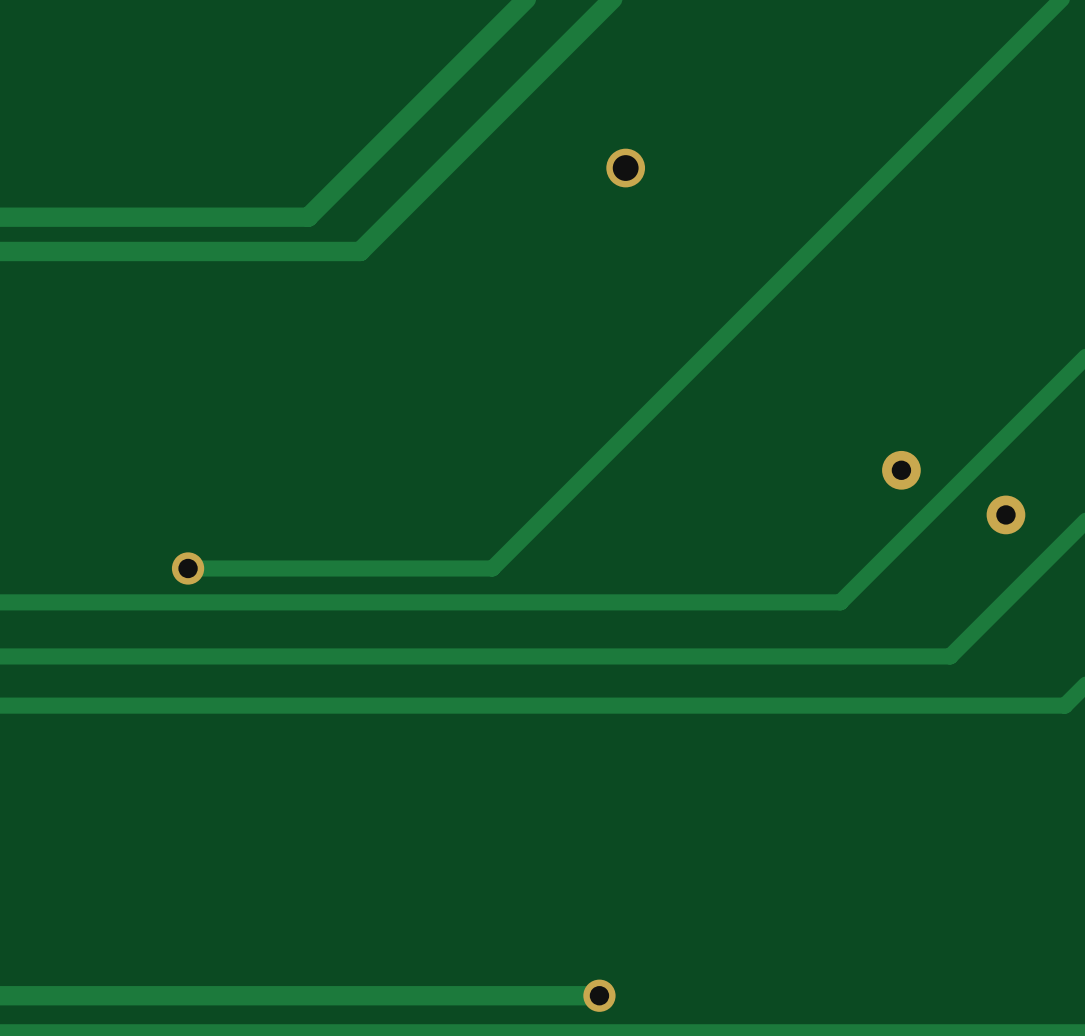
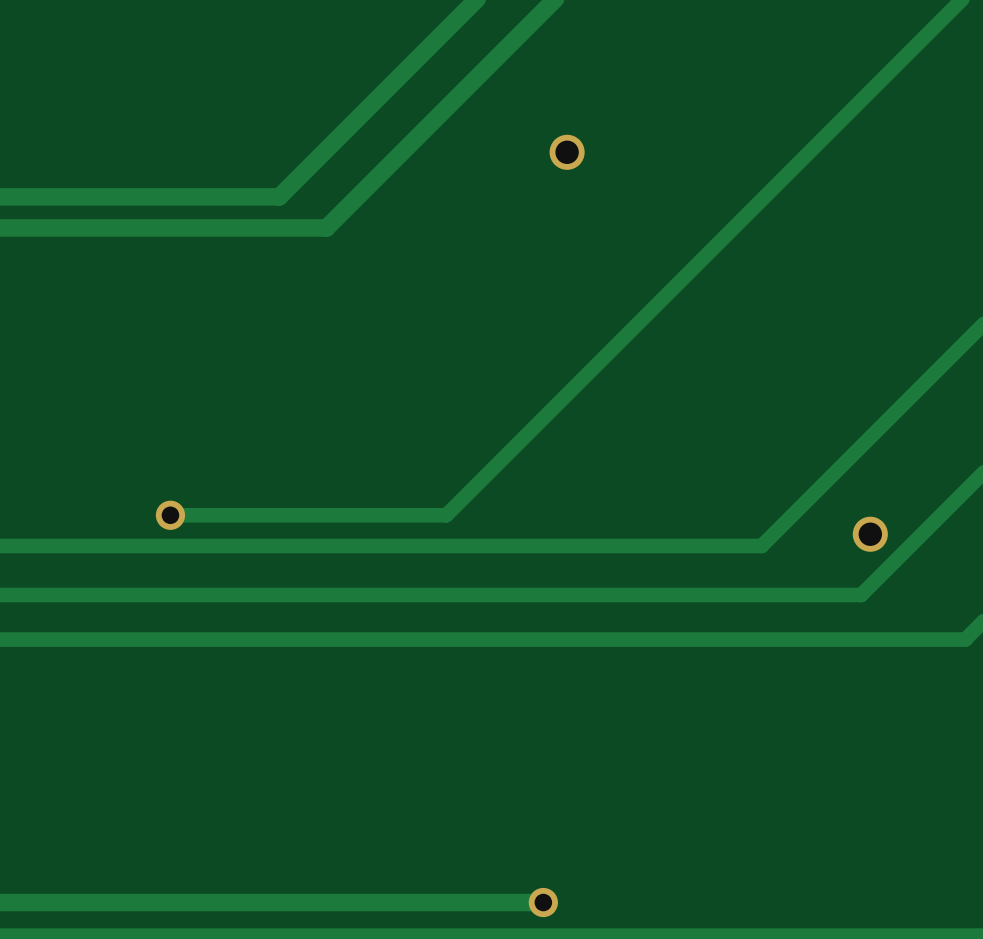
via: (901, 470) -> none
via: (1005, 514) -> none
via: none -> (870, 534)

